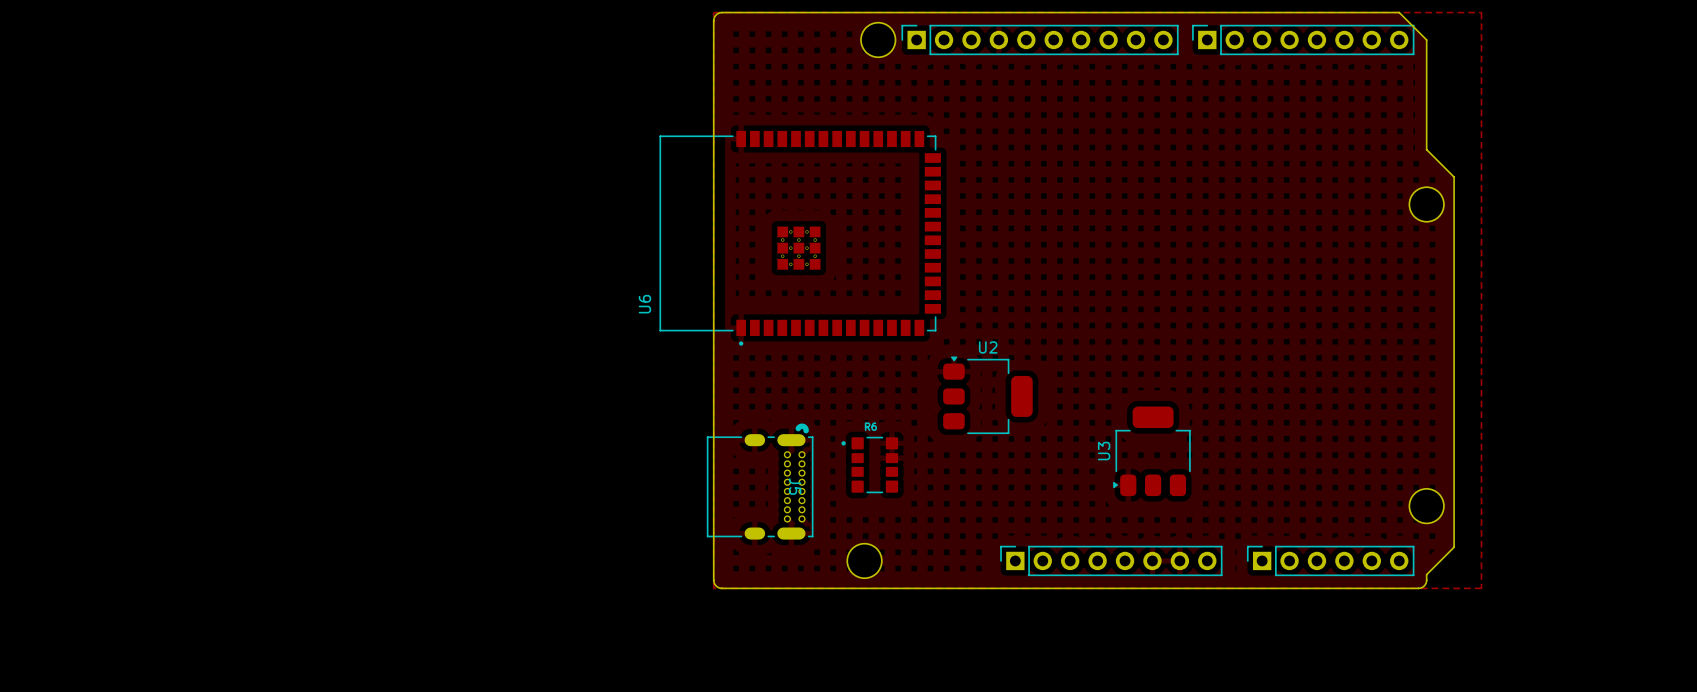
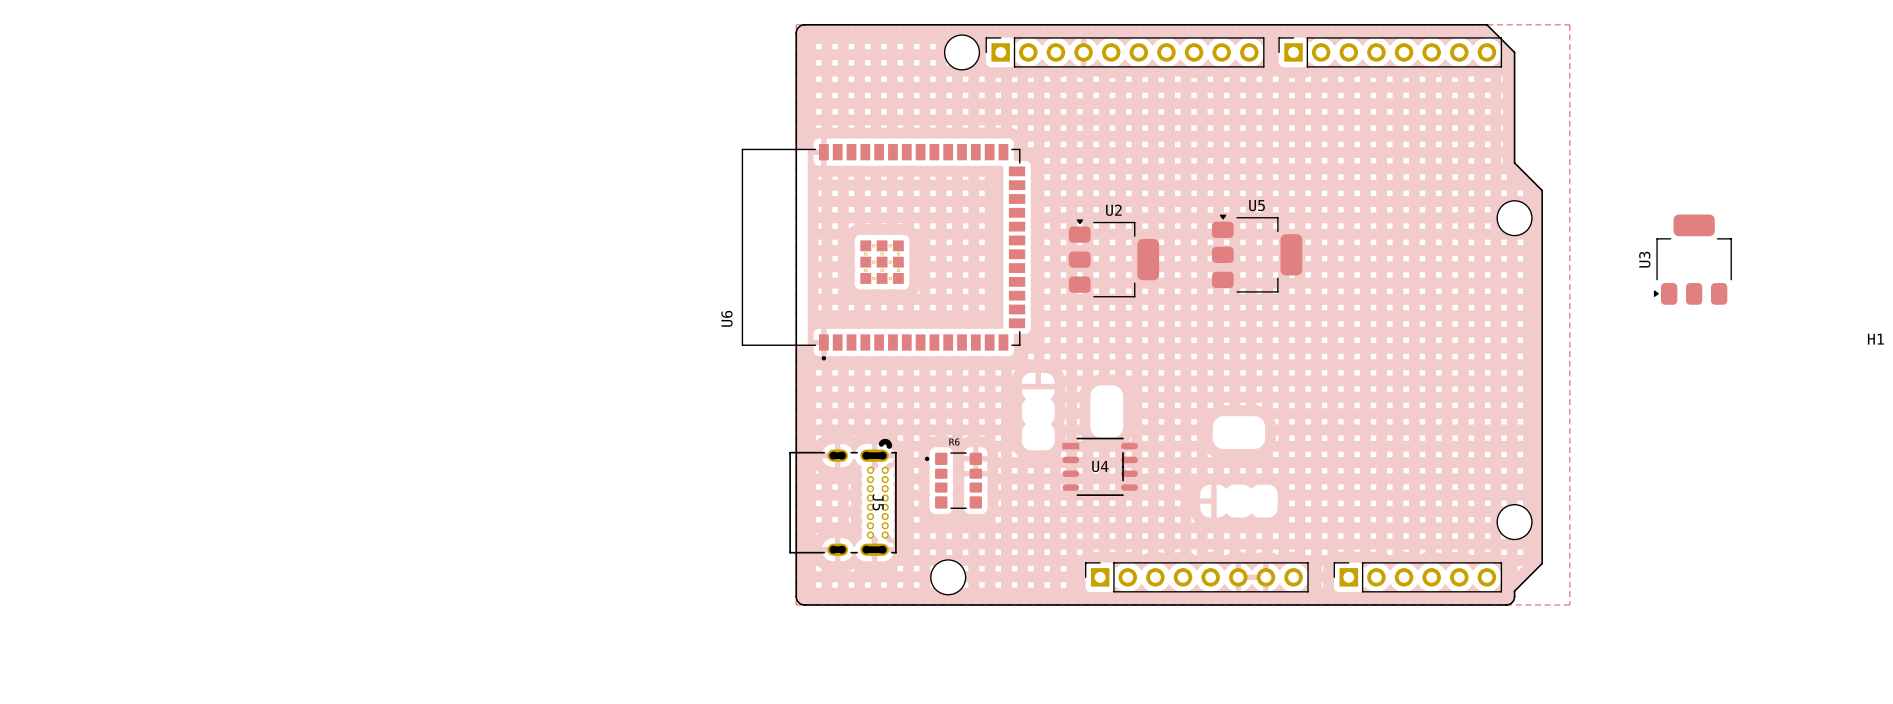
U5: none -> (1257, 253)
U2 position: (987, 395) -> (1113, 258)
U4: none -> (1100, 466)
U3 position: (1151, 451) -> (1692, 259)

